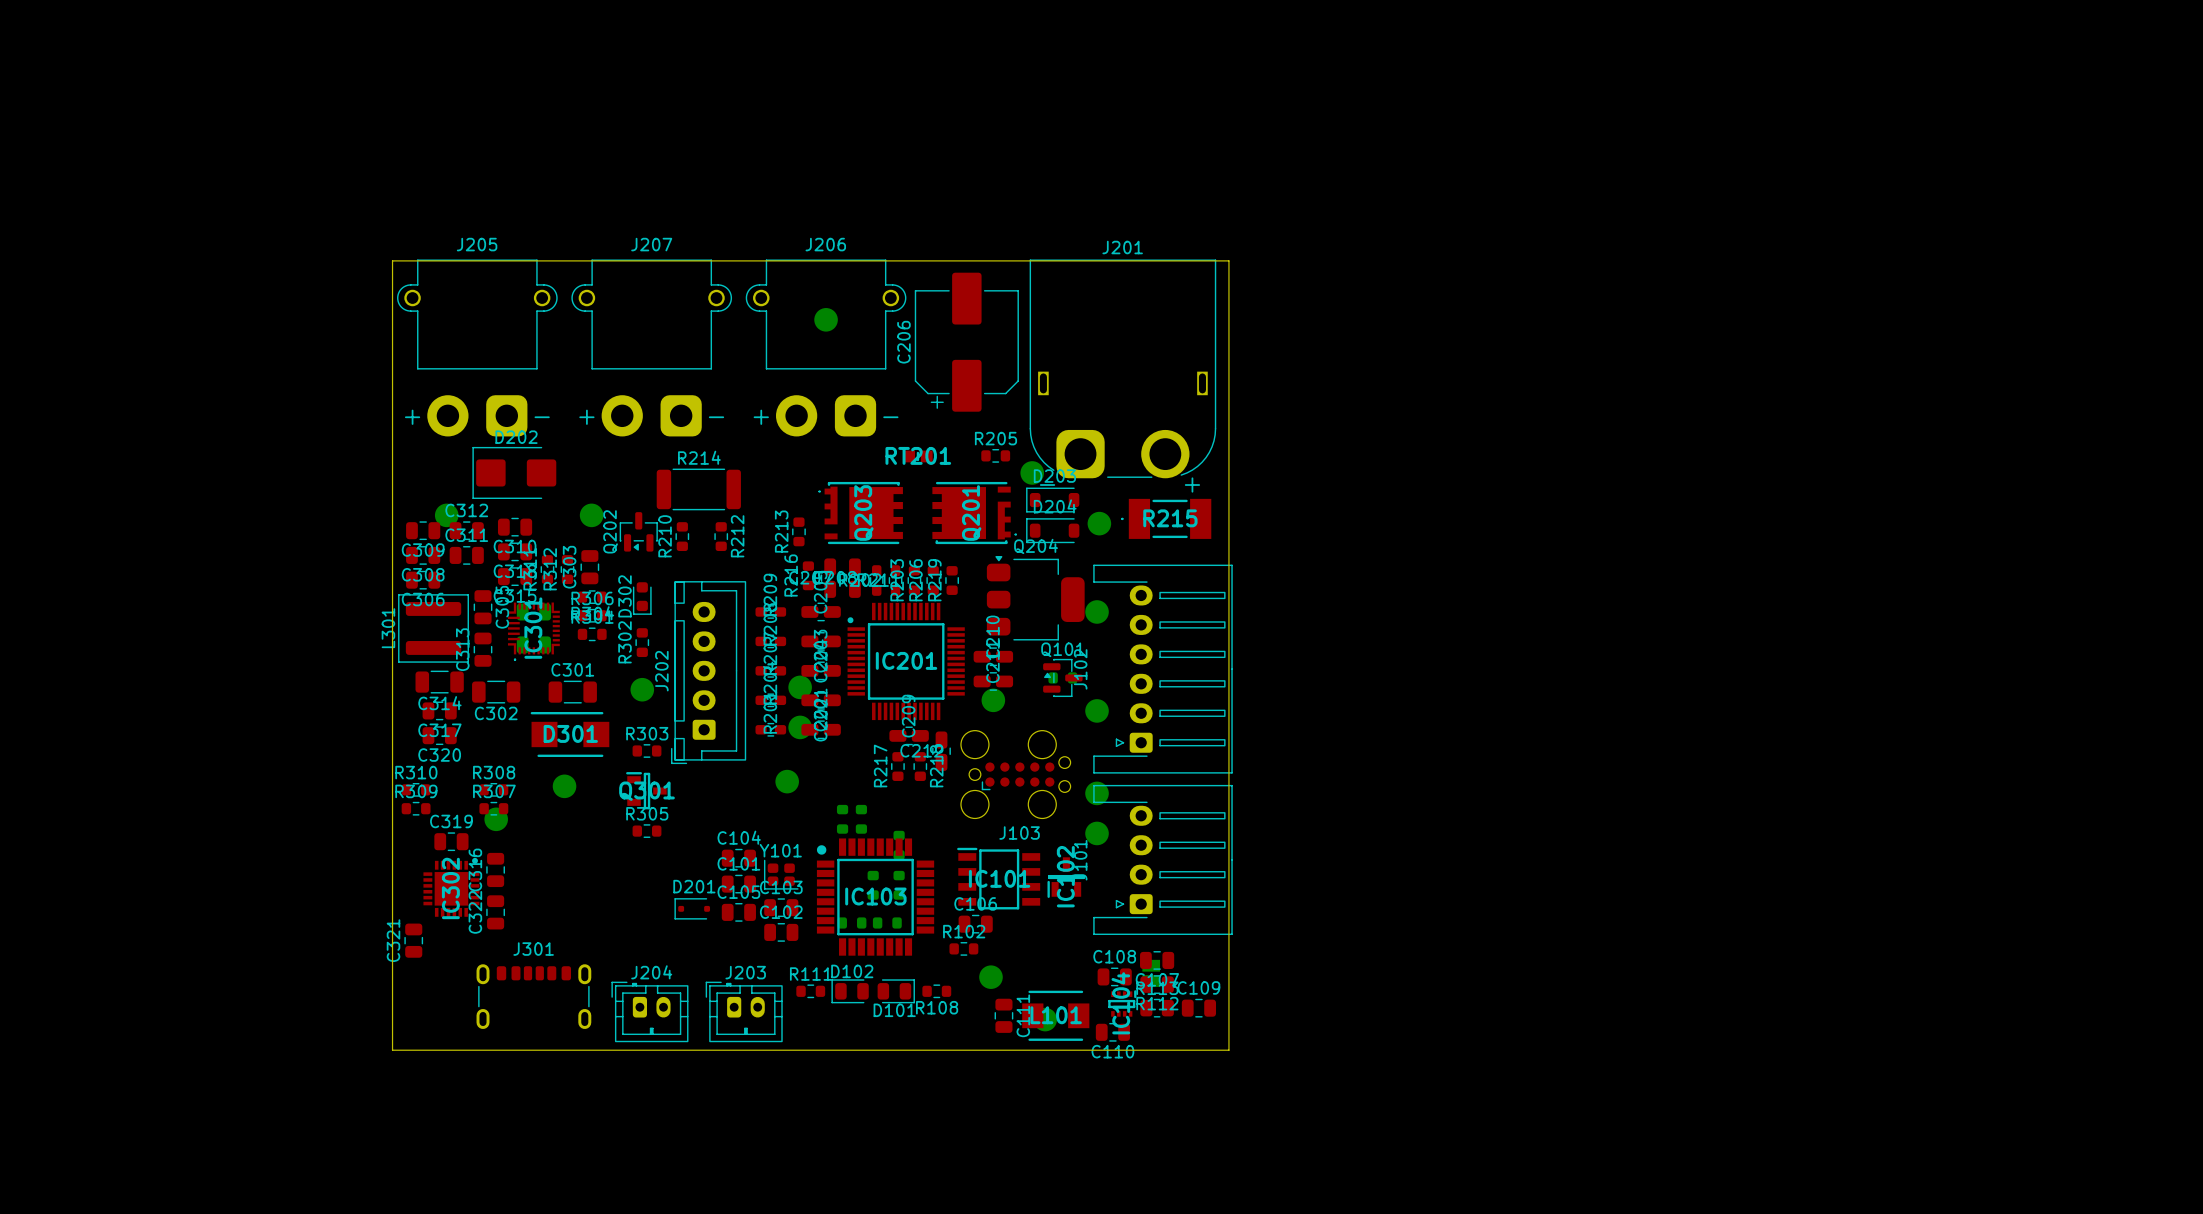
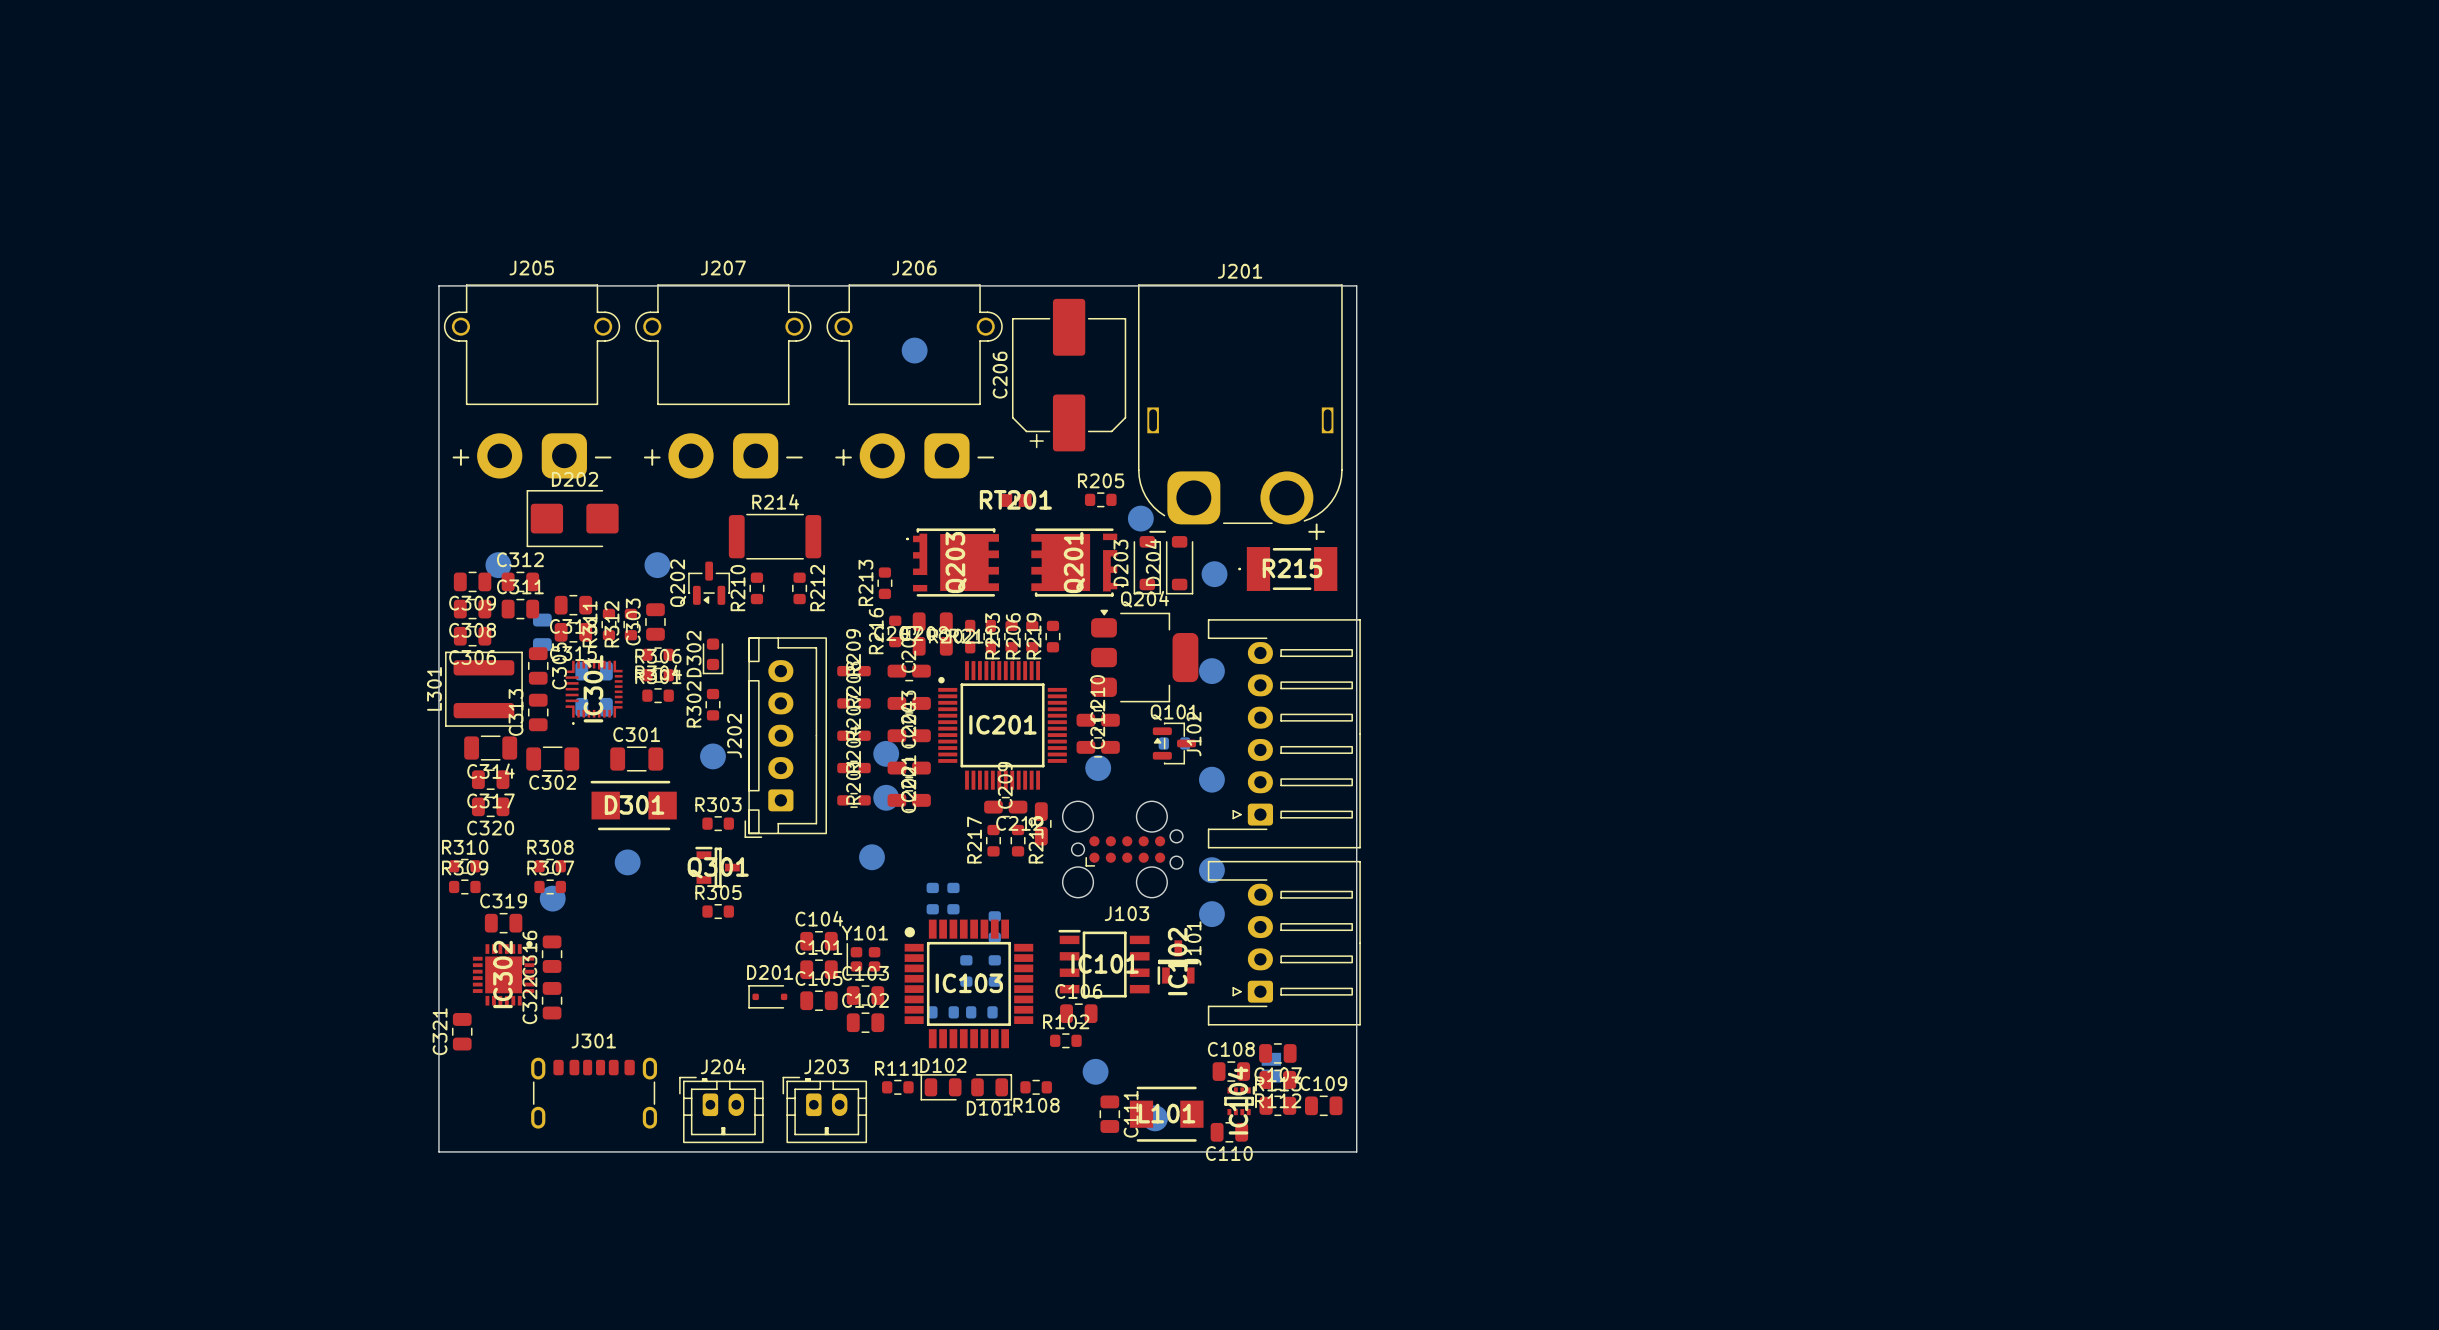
D203 rotation: 0° (1052, 500) -> 90° counterclockwise (1147, 565)
C310 side: top (515, 527) -> bottom (542, 632)
D204 rotation: 0° (1052, 530) -> 90° counterclockwise (1179, 565)

